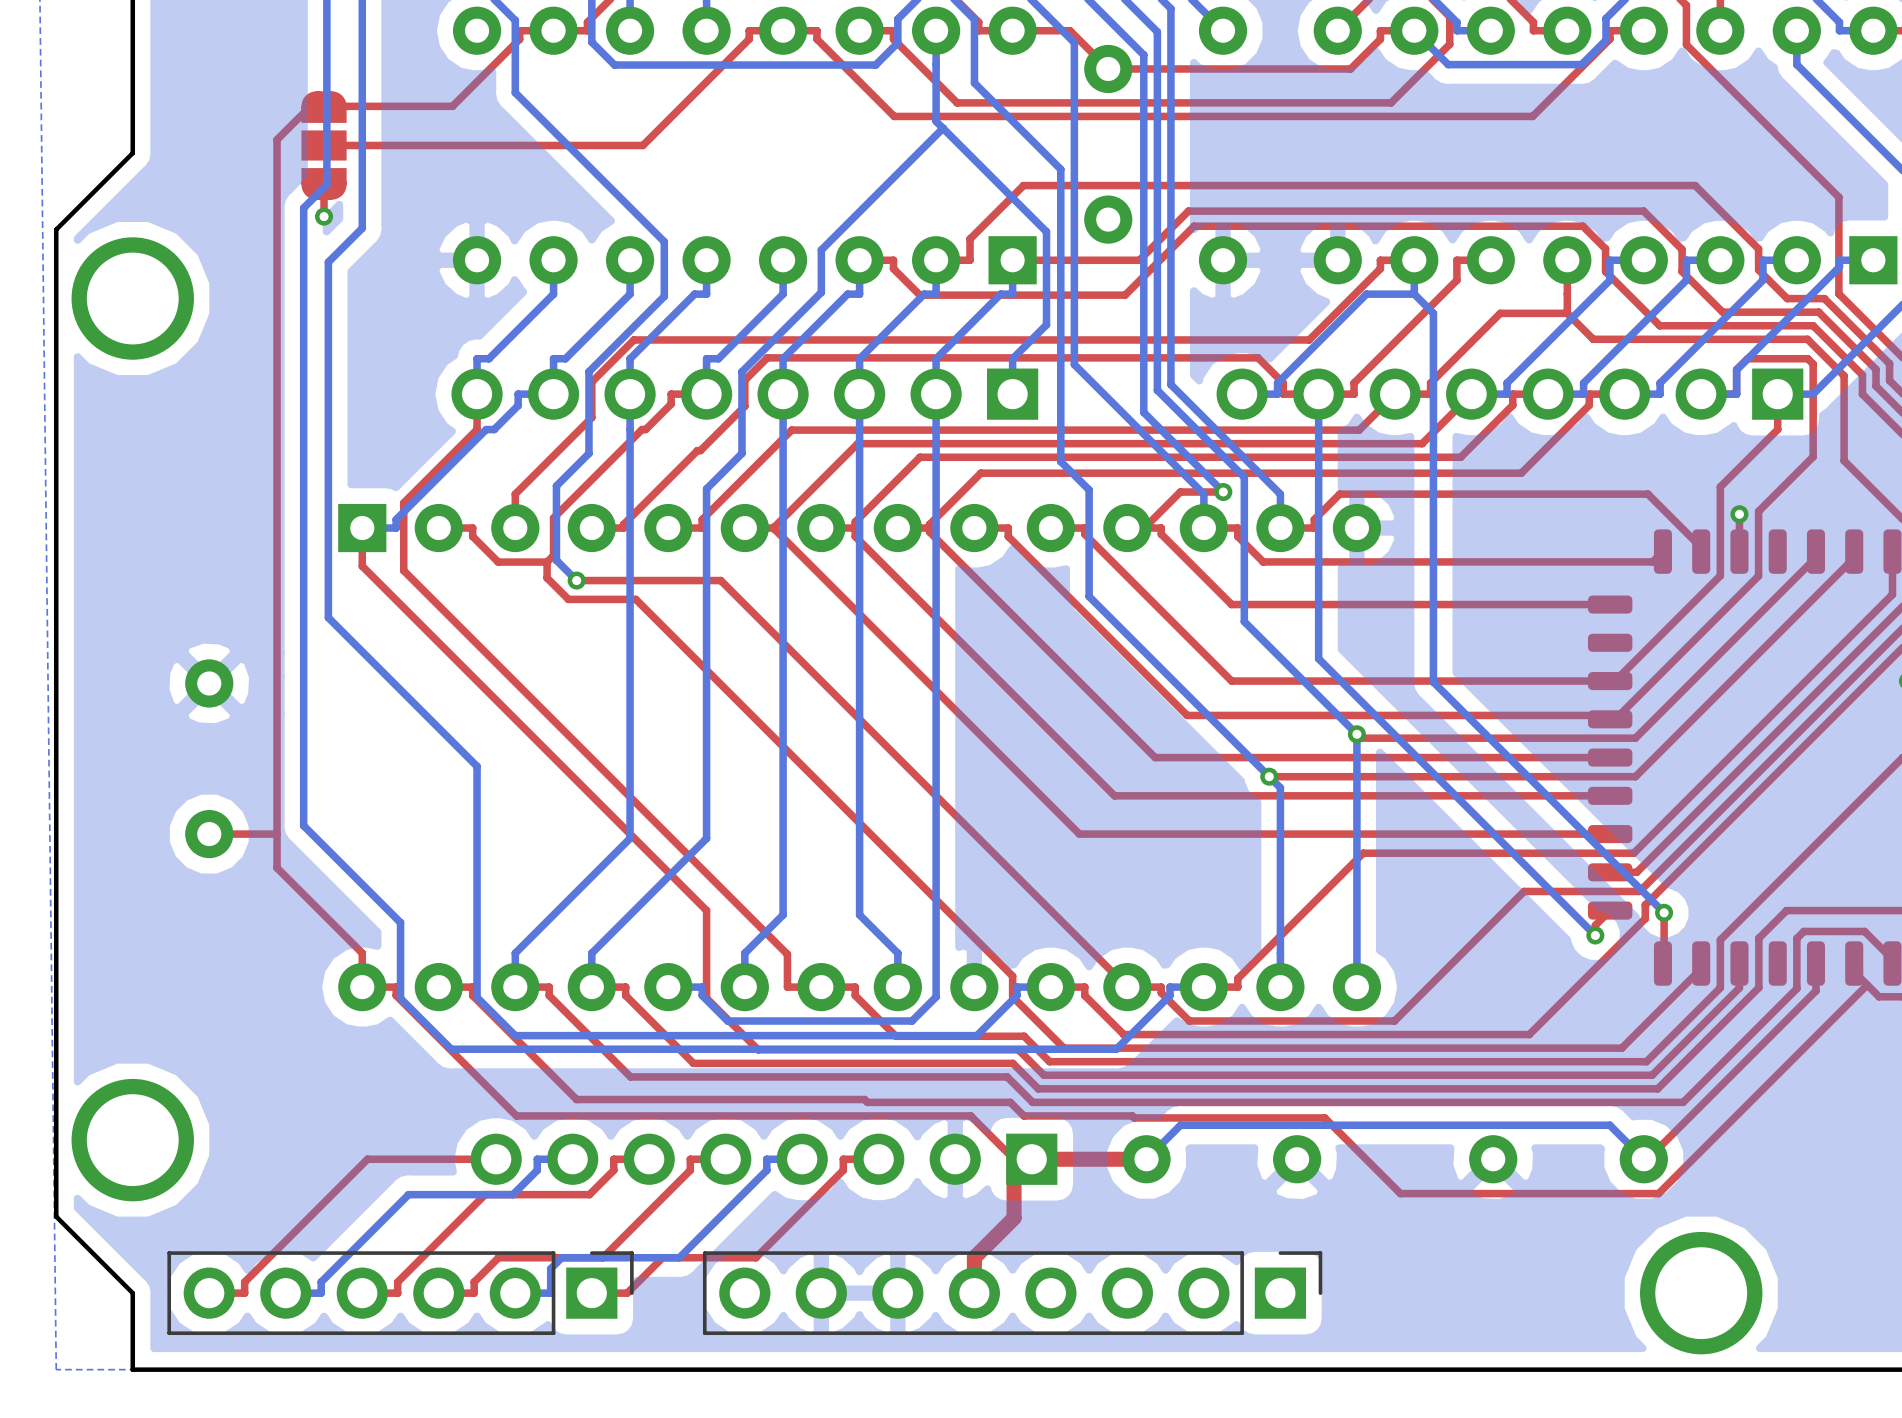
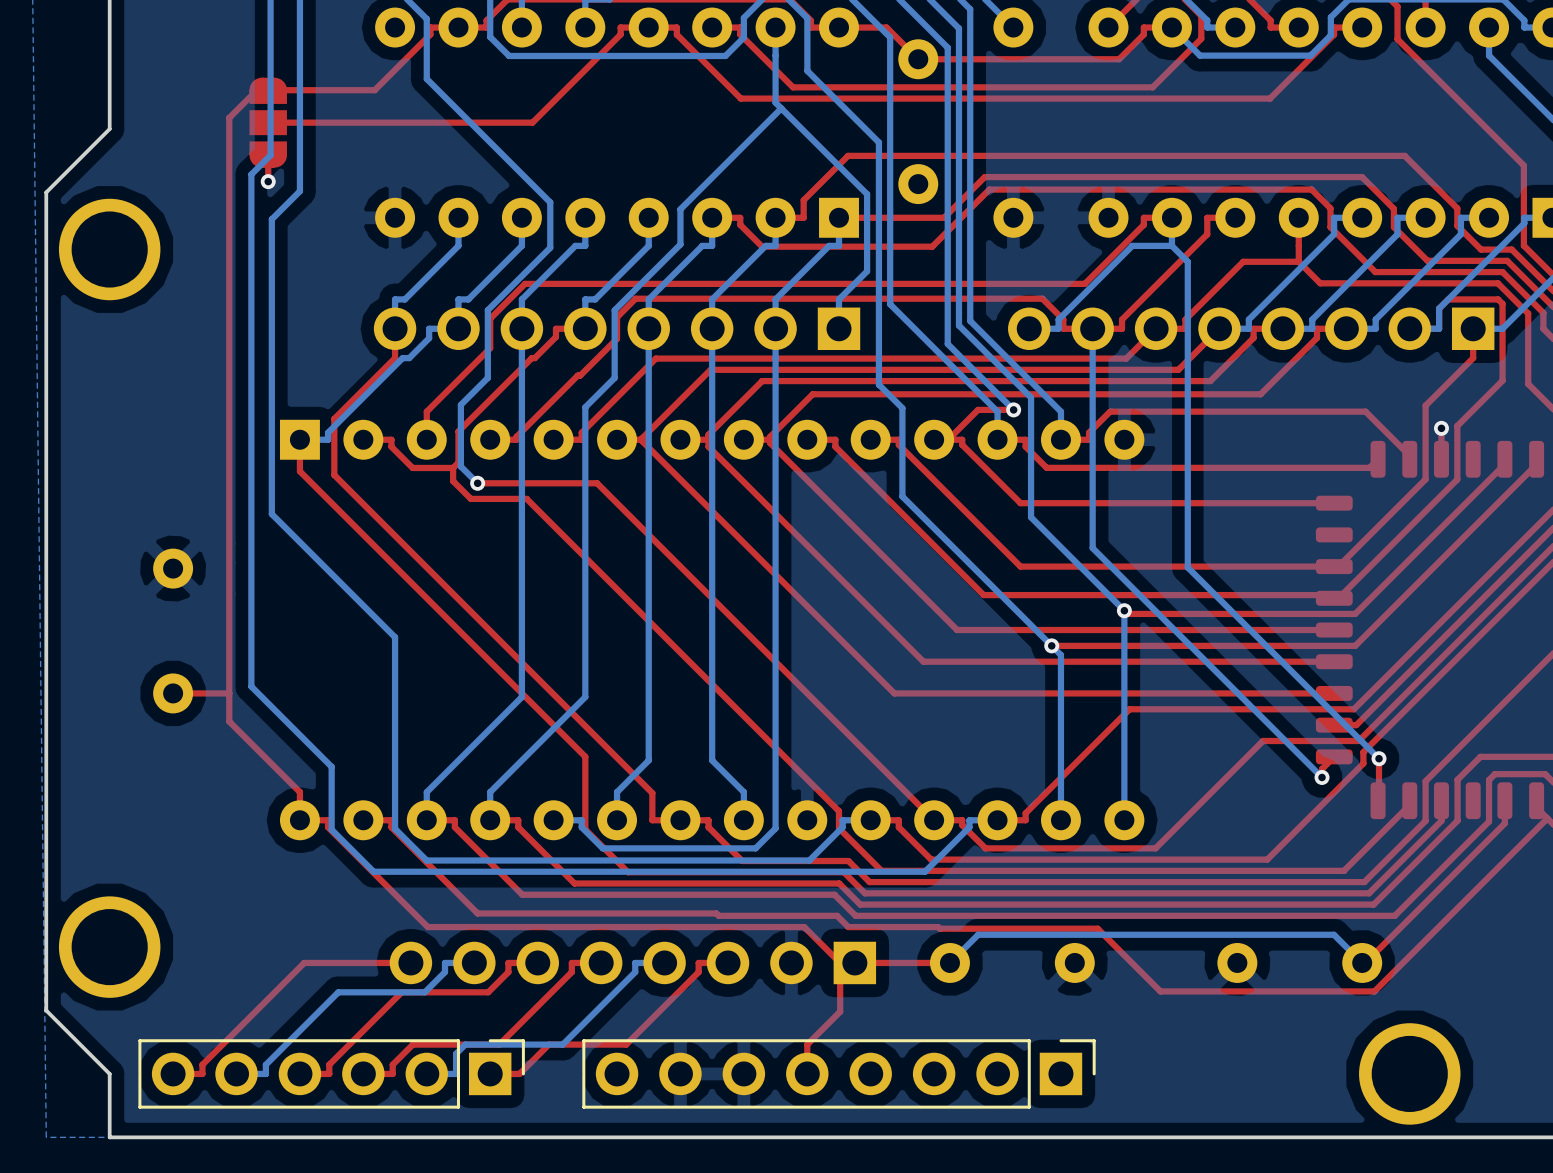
top track width: thick (1014, 1159) (1014, 1218) (974, 1257) (974, 1293) -> thin (840, 962) (840, 1011) (807, 1044) (807, 1073)
top track width: thick (1146, 1159) (1031, 1159) -> thin (949, 962) (854, 962)

